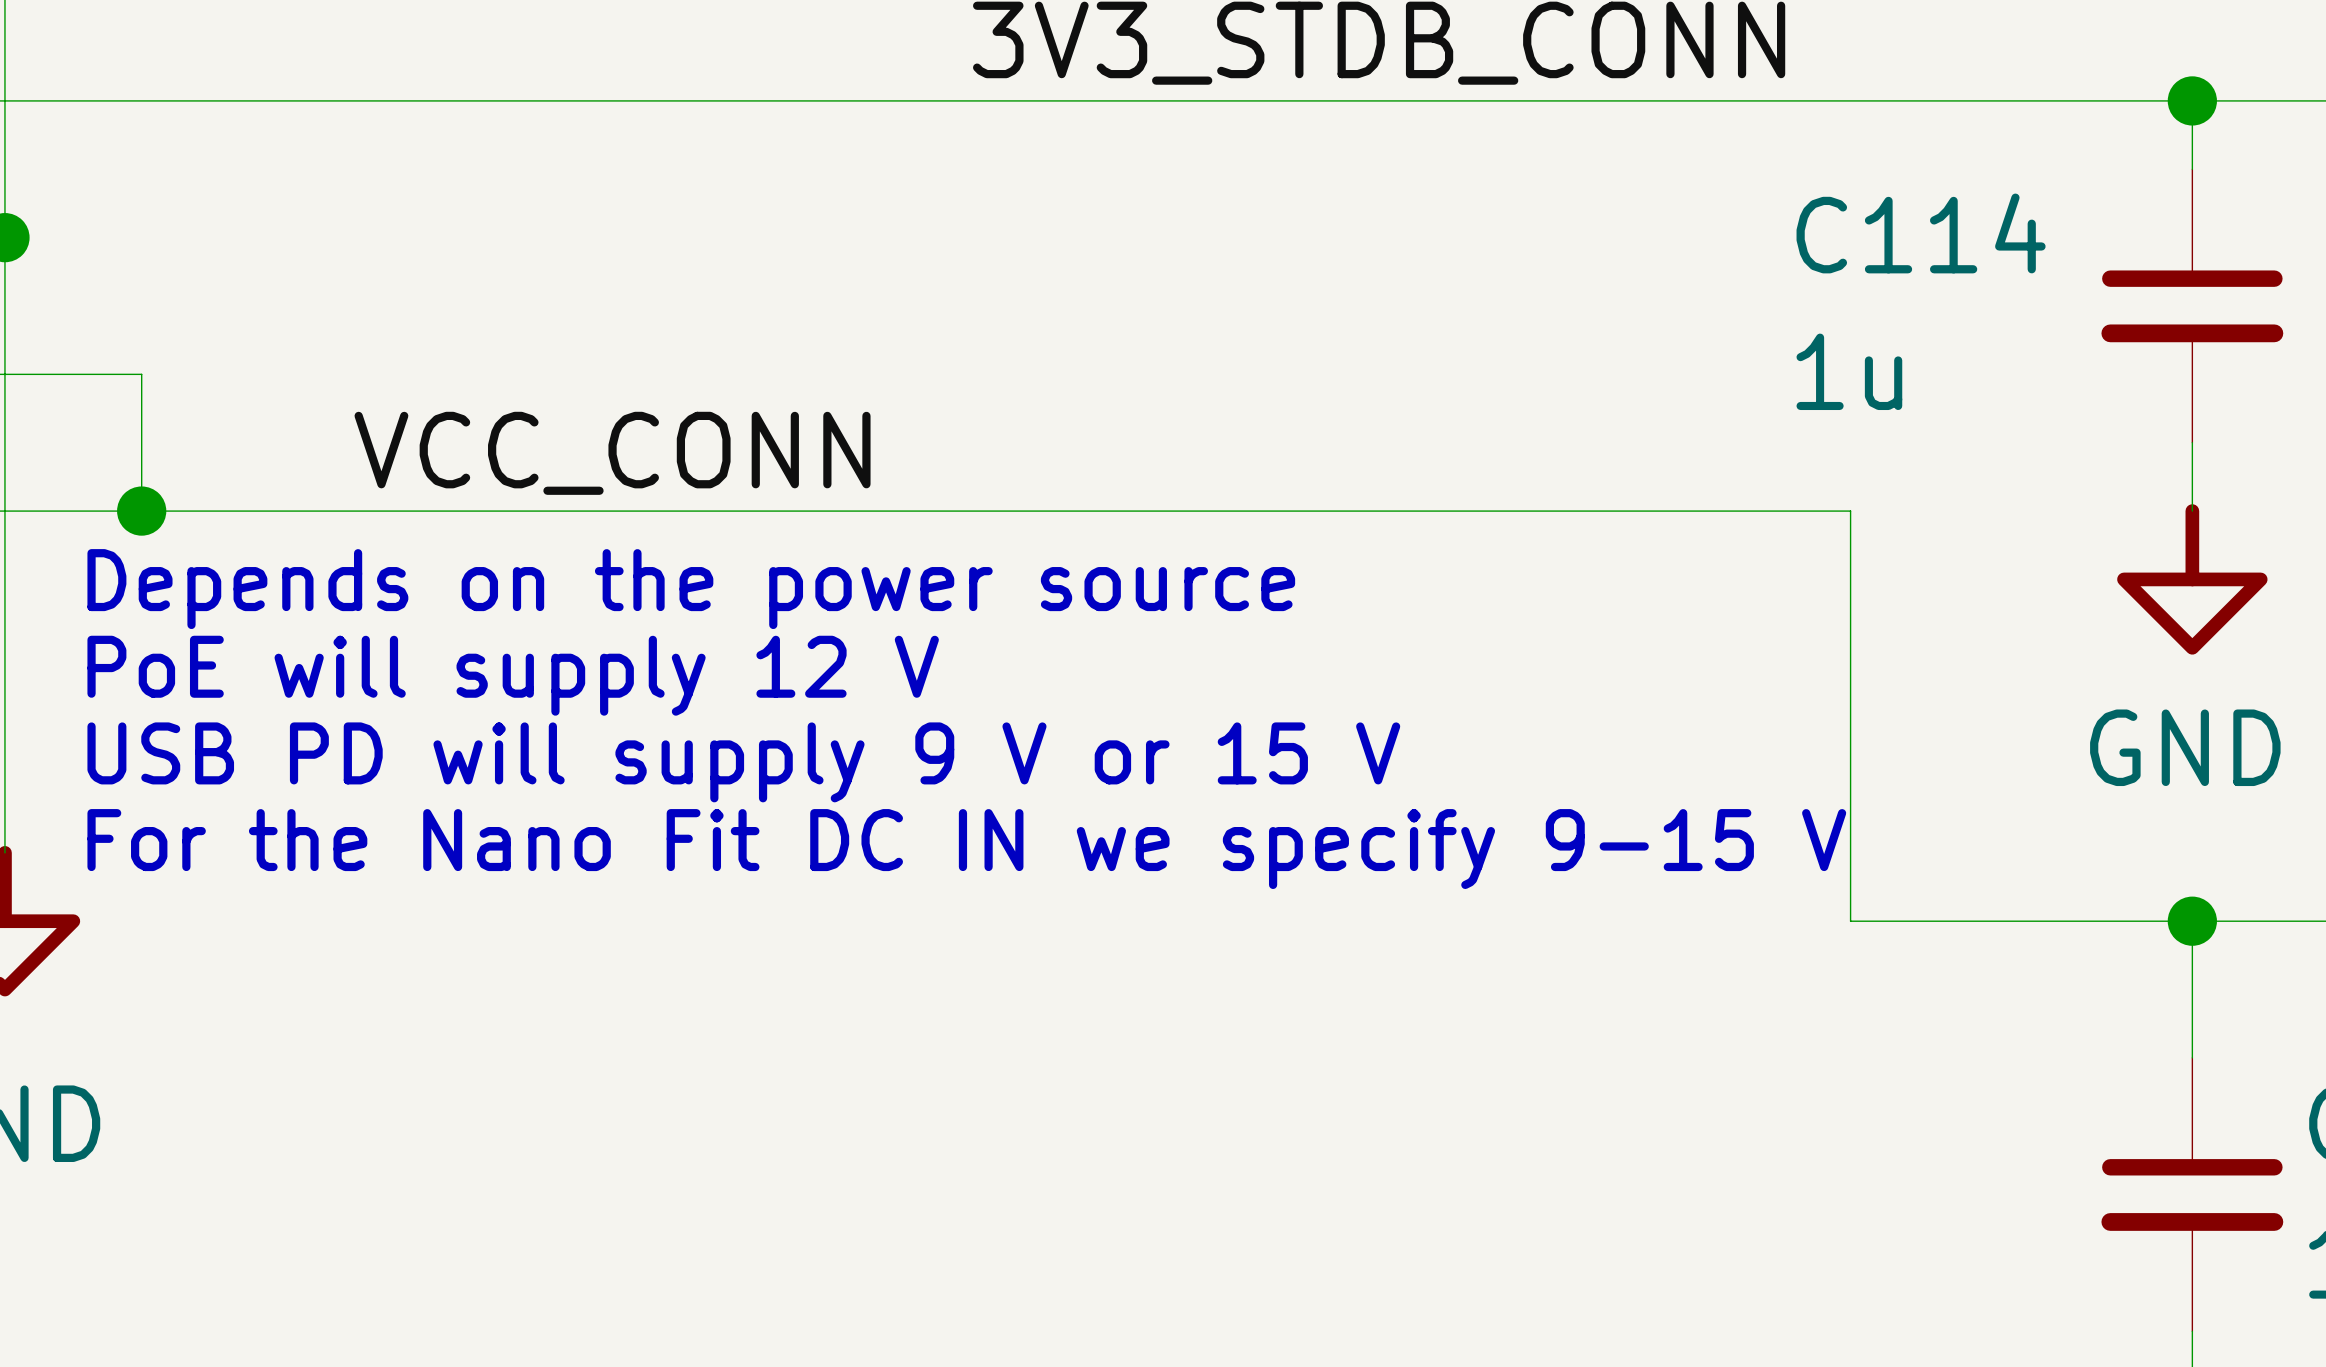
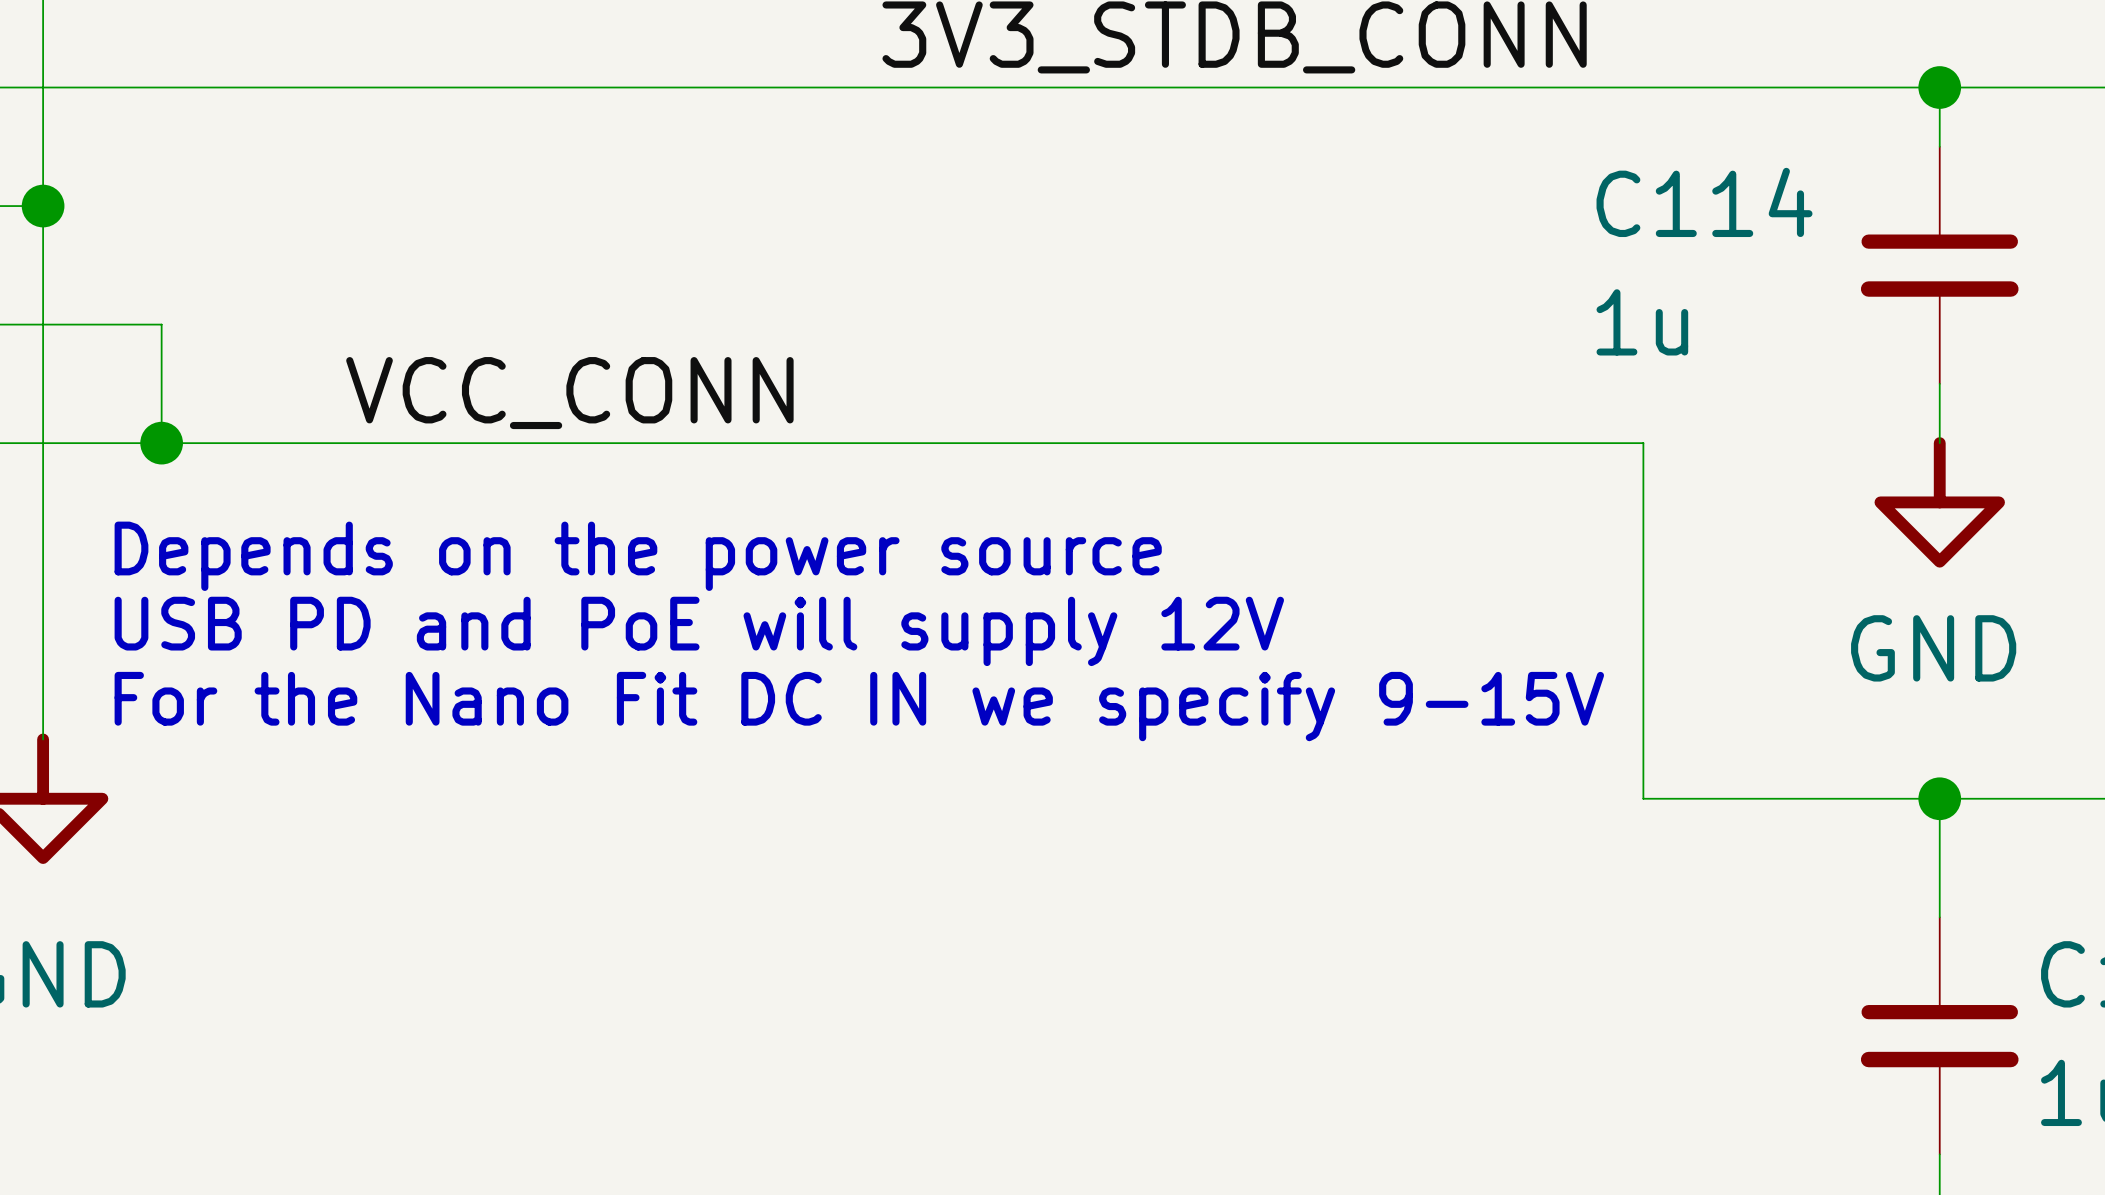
text position: Depends on the power source (691, 589) -> Depends on the power source (638, 556)
text: PoE will supply 12 V (513, 675) -> none
text: none -> USB PD and PoE will supply 12V (699, 631)
text: USB PD will supply 9 V or 15 V (743, 762) -> none
text: For the Nano Fit DC IN we specify 9-15 V (966, 849) -> For the Nano Fit DC IN we specify 9-15V (859, 706)

